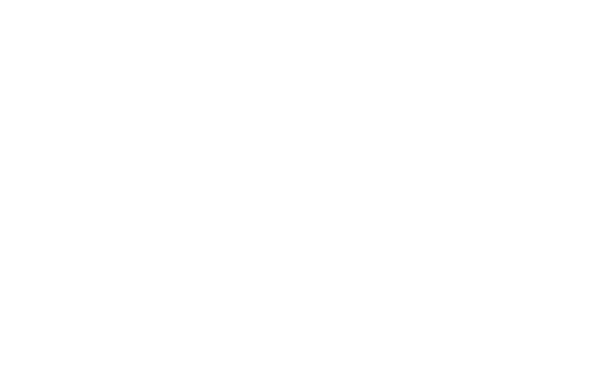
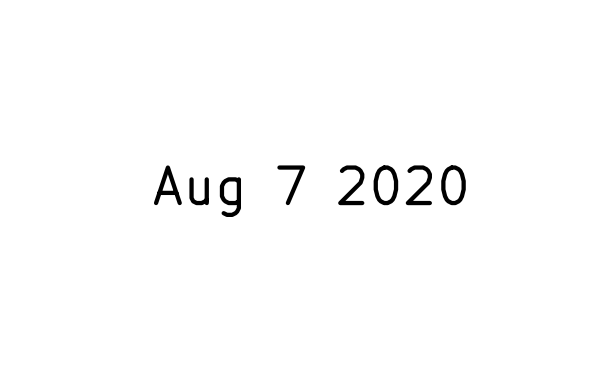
text: none -> Aug 7 2020 (309, 191)

